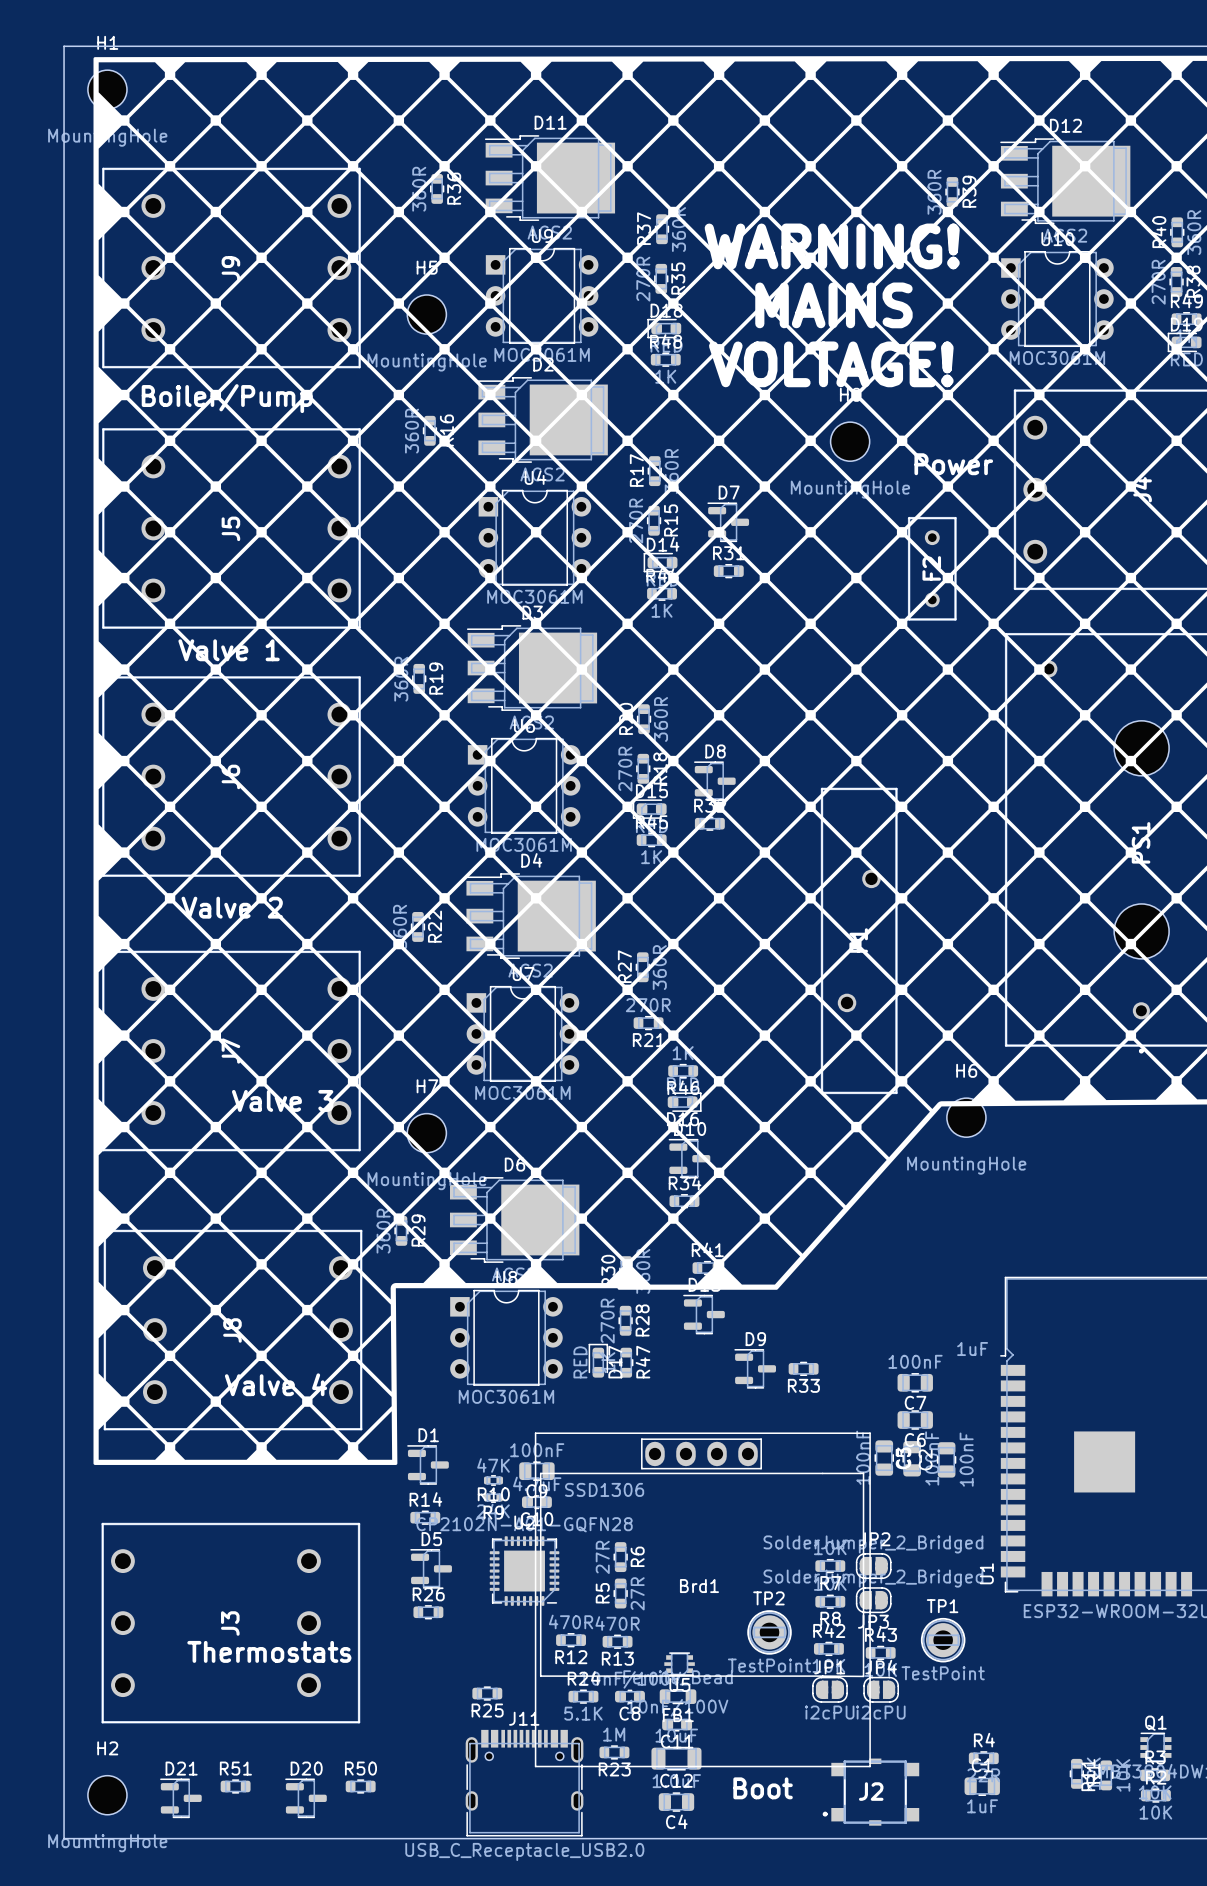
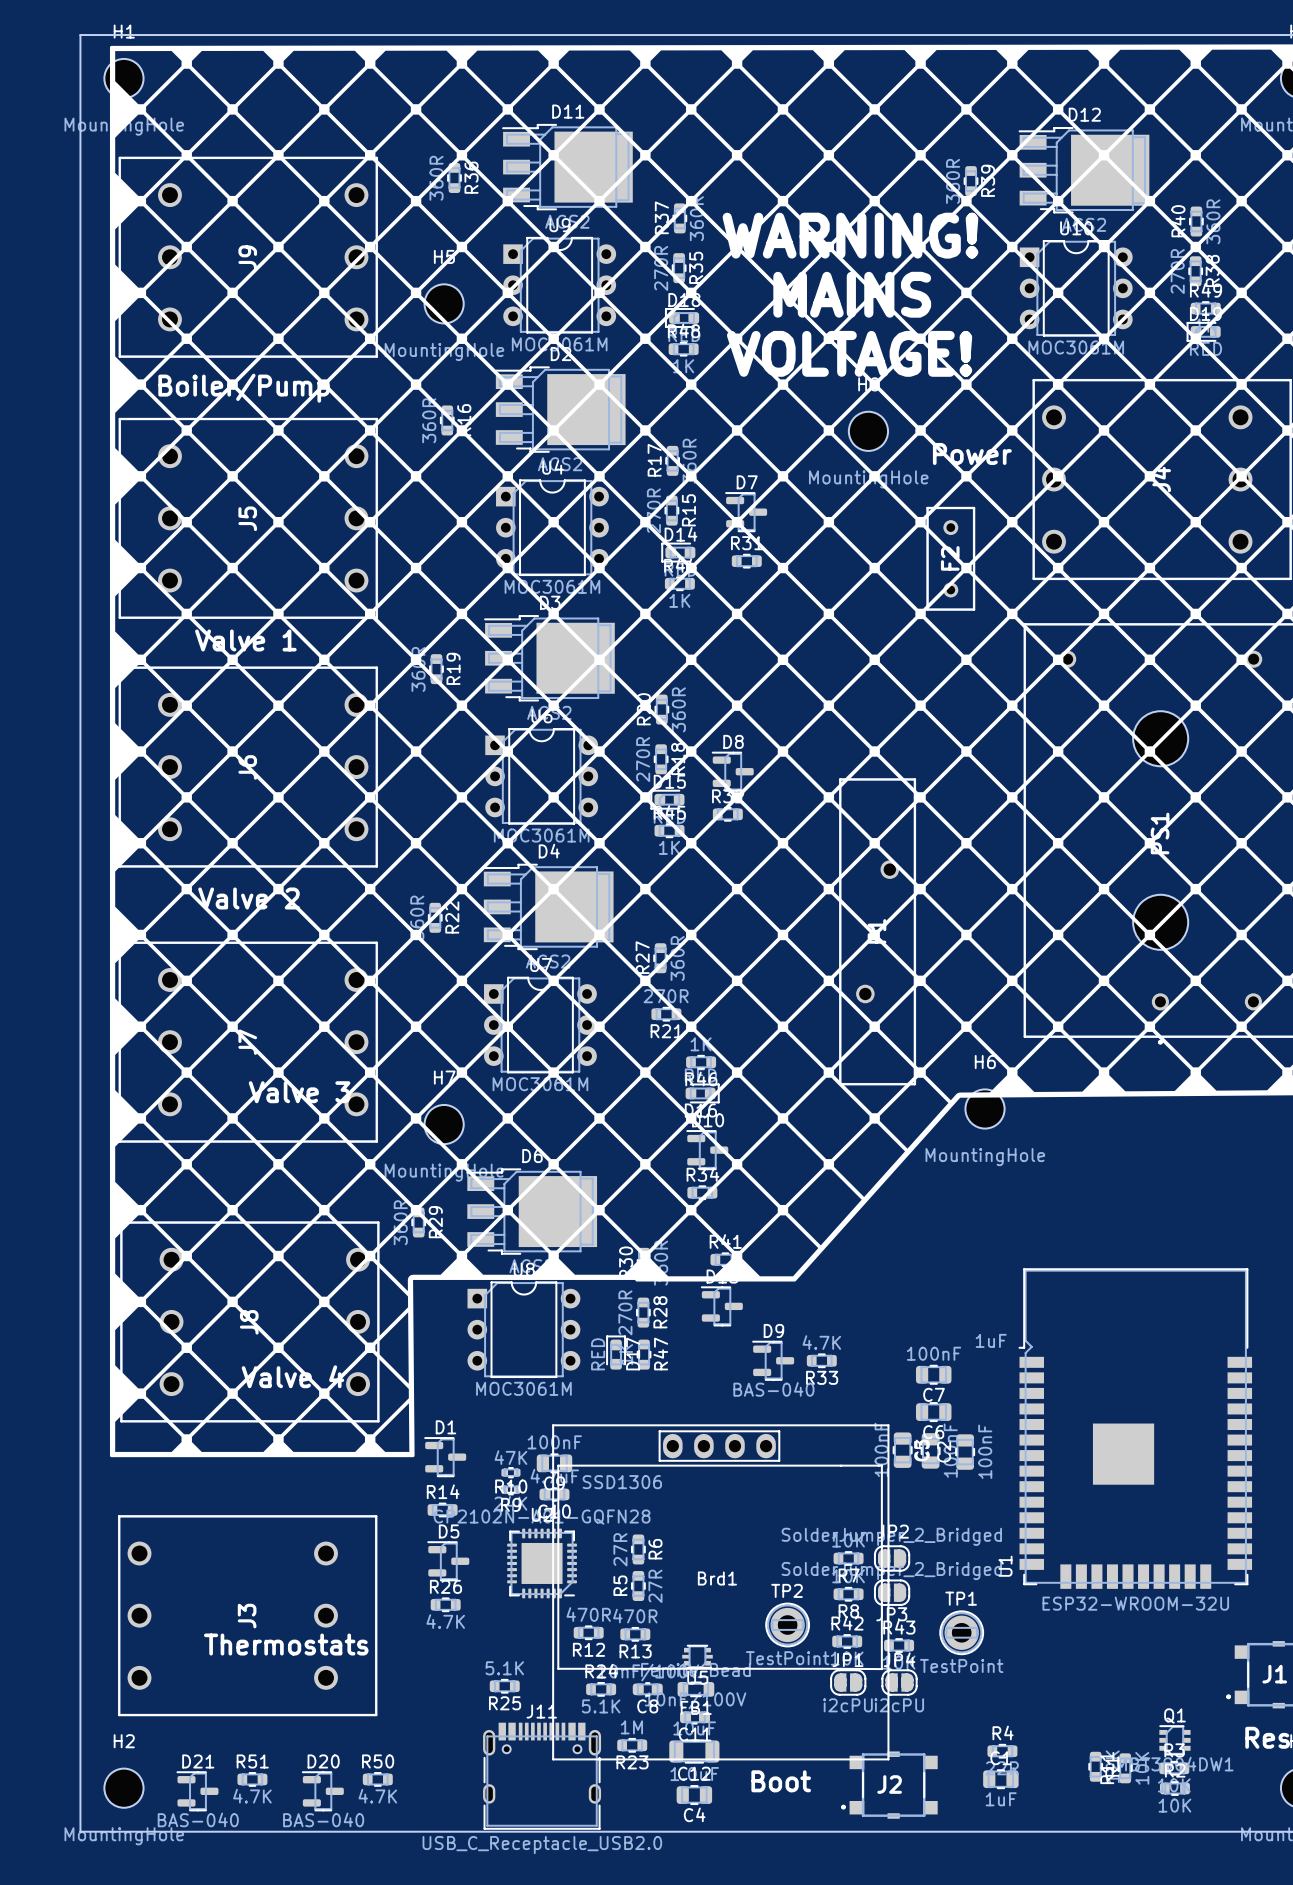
R33 value: none -> 4.7K (821, 1342)
D9 value: none -> BAS-040 (773, 1389)
R26 value: none -> 4.7K (445, 1621)
R25 value: none -> 5.1K (504, 1668)
R51 value: none -> 4.7K (252, 1796)
R50 value: none -> 4.7K (377, 1796)
D21 value: none -> BAS-040 (198, 1819)
D20 value: none -> BAS-040 (323, 1819)

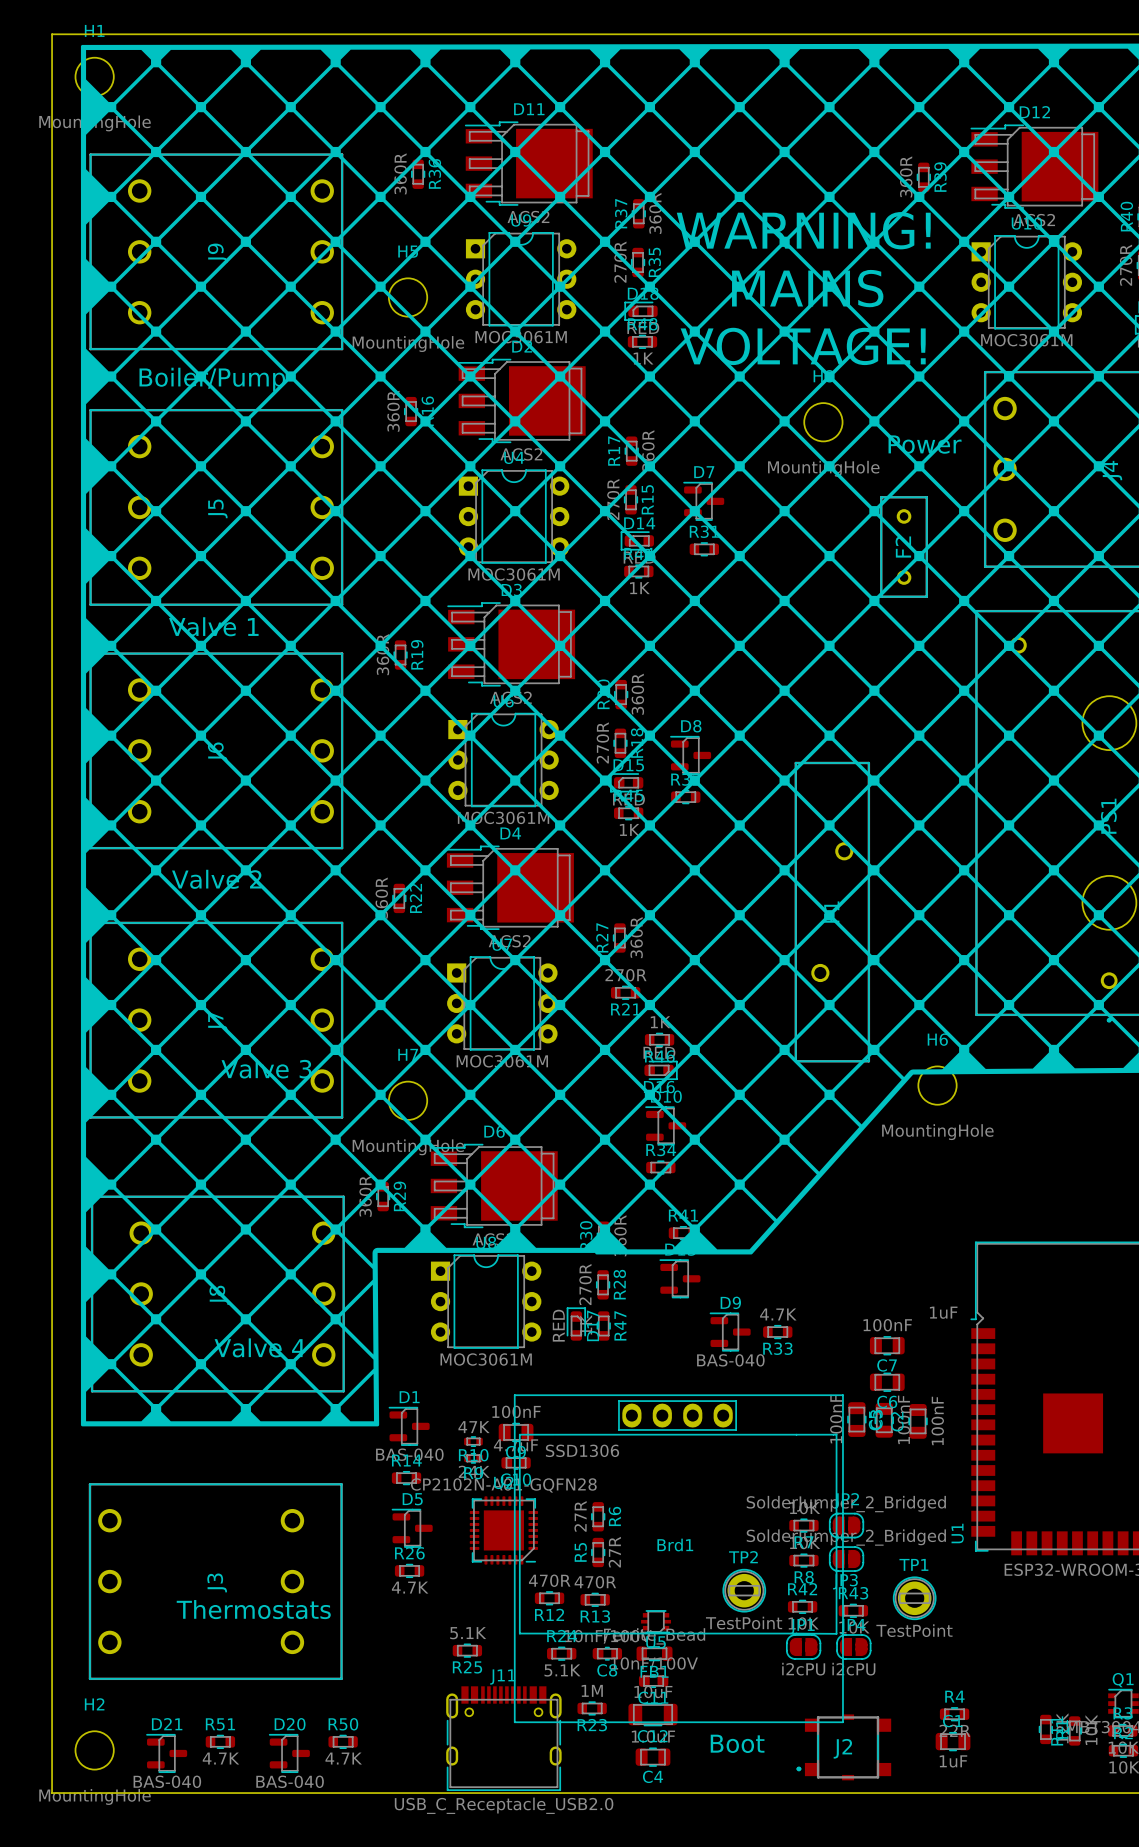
D1 value: none -> BAS-040 (409, 1454)

